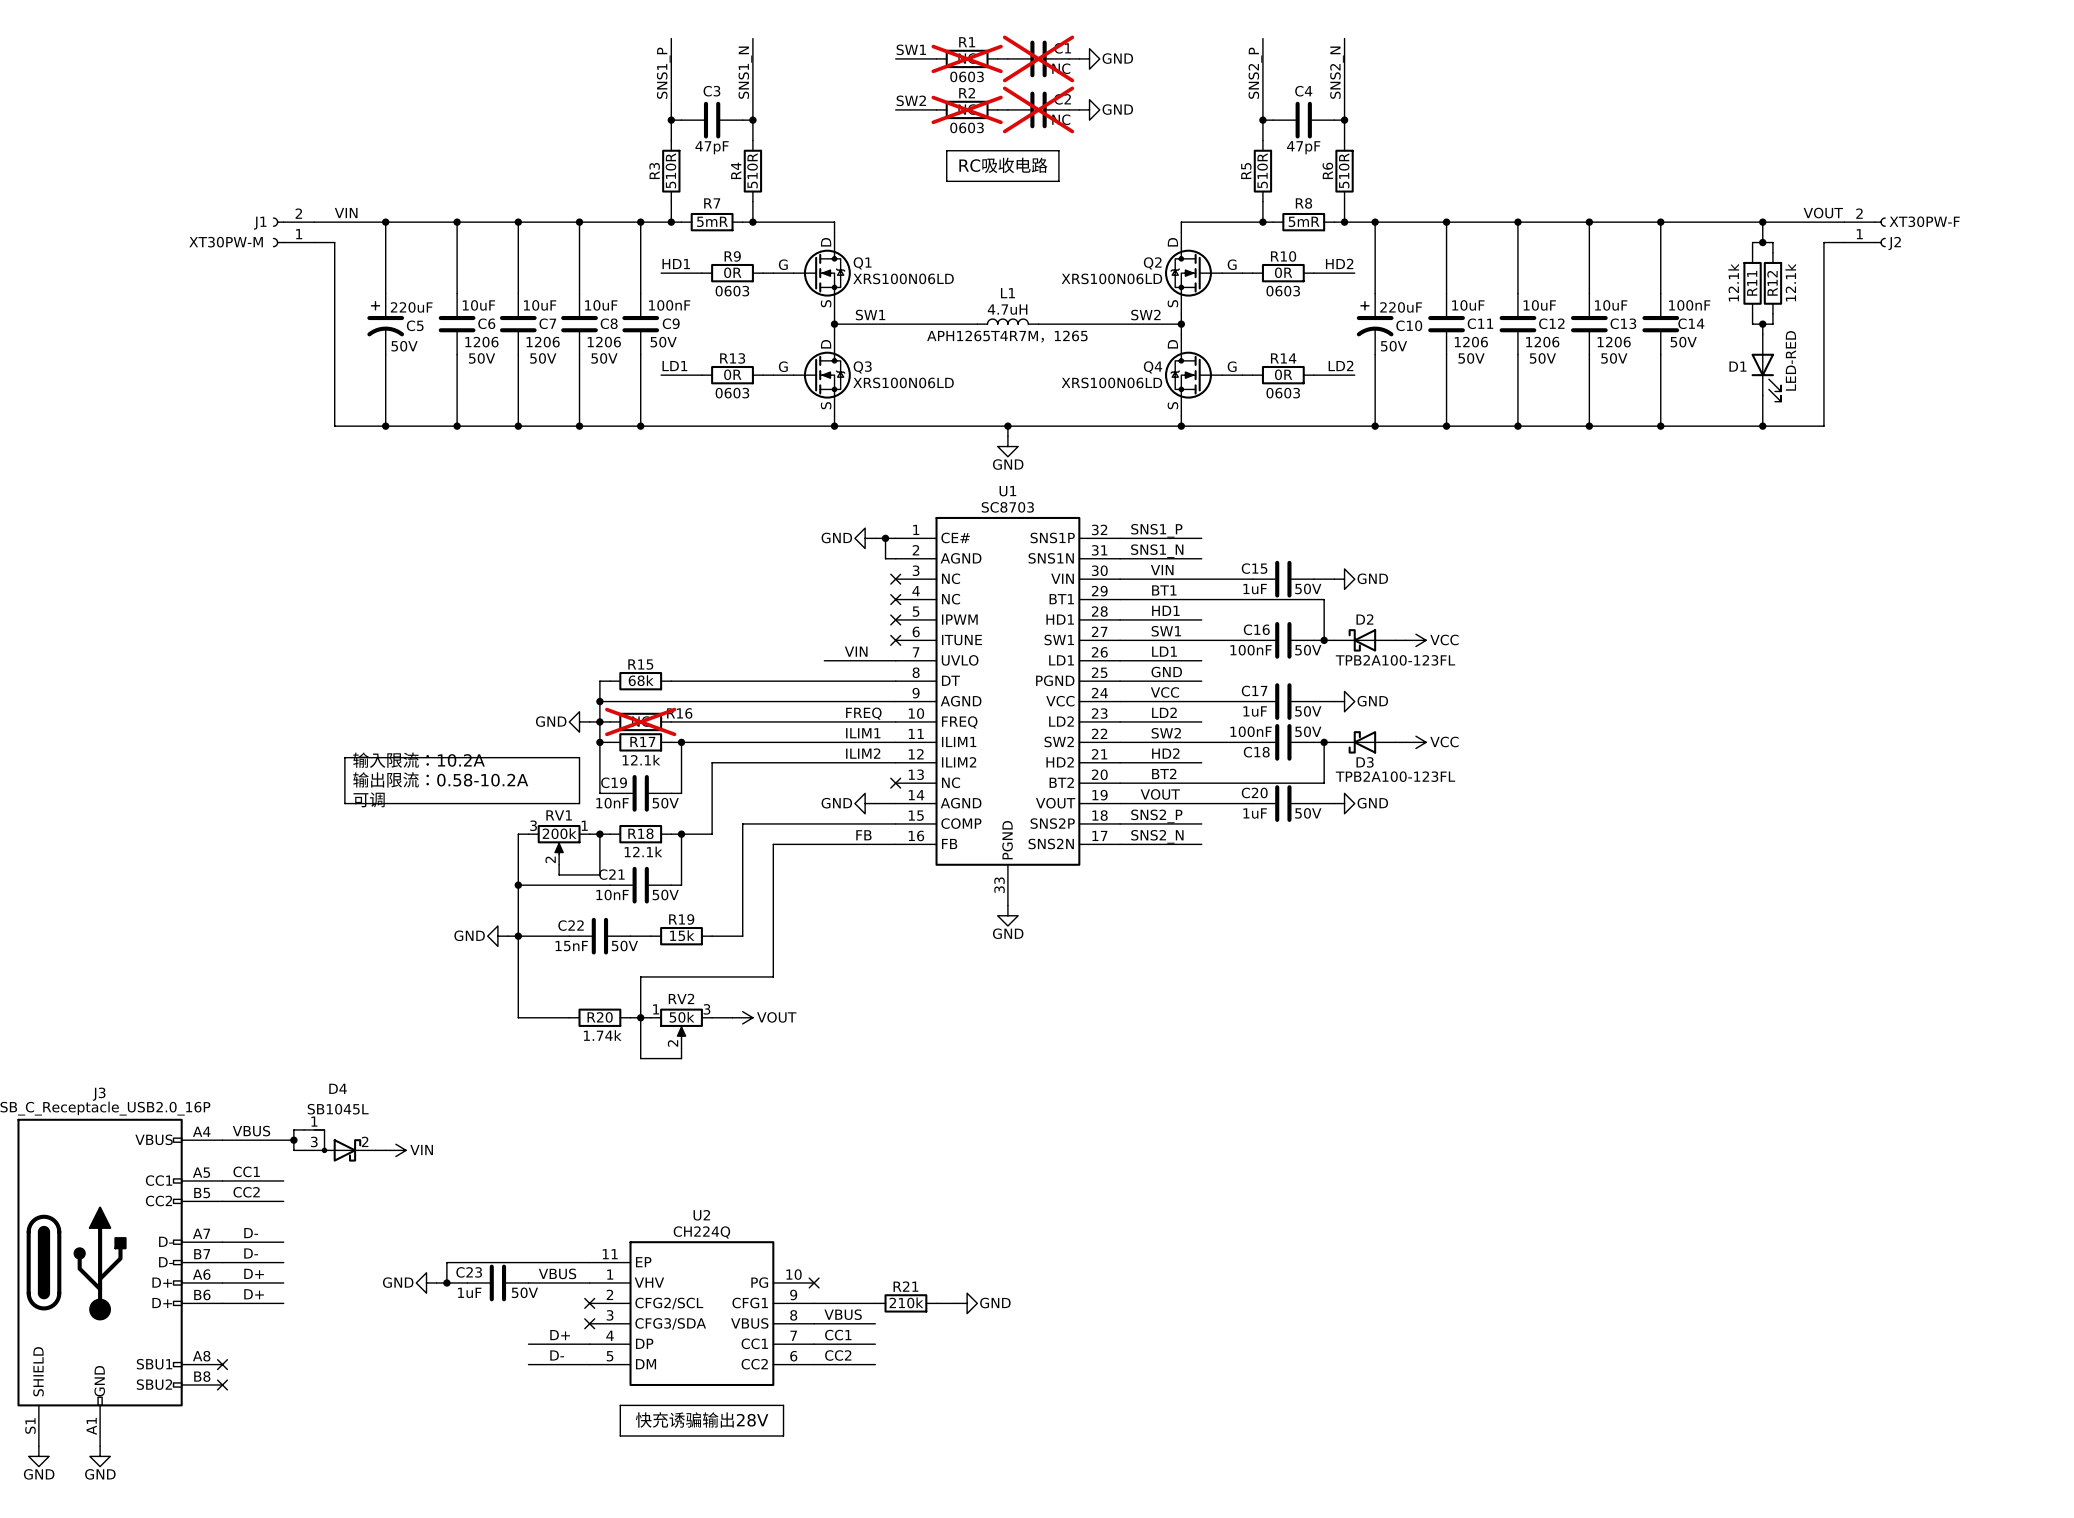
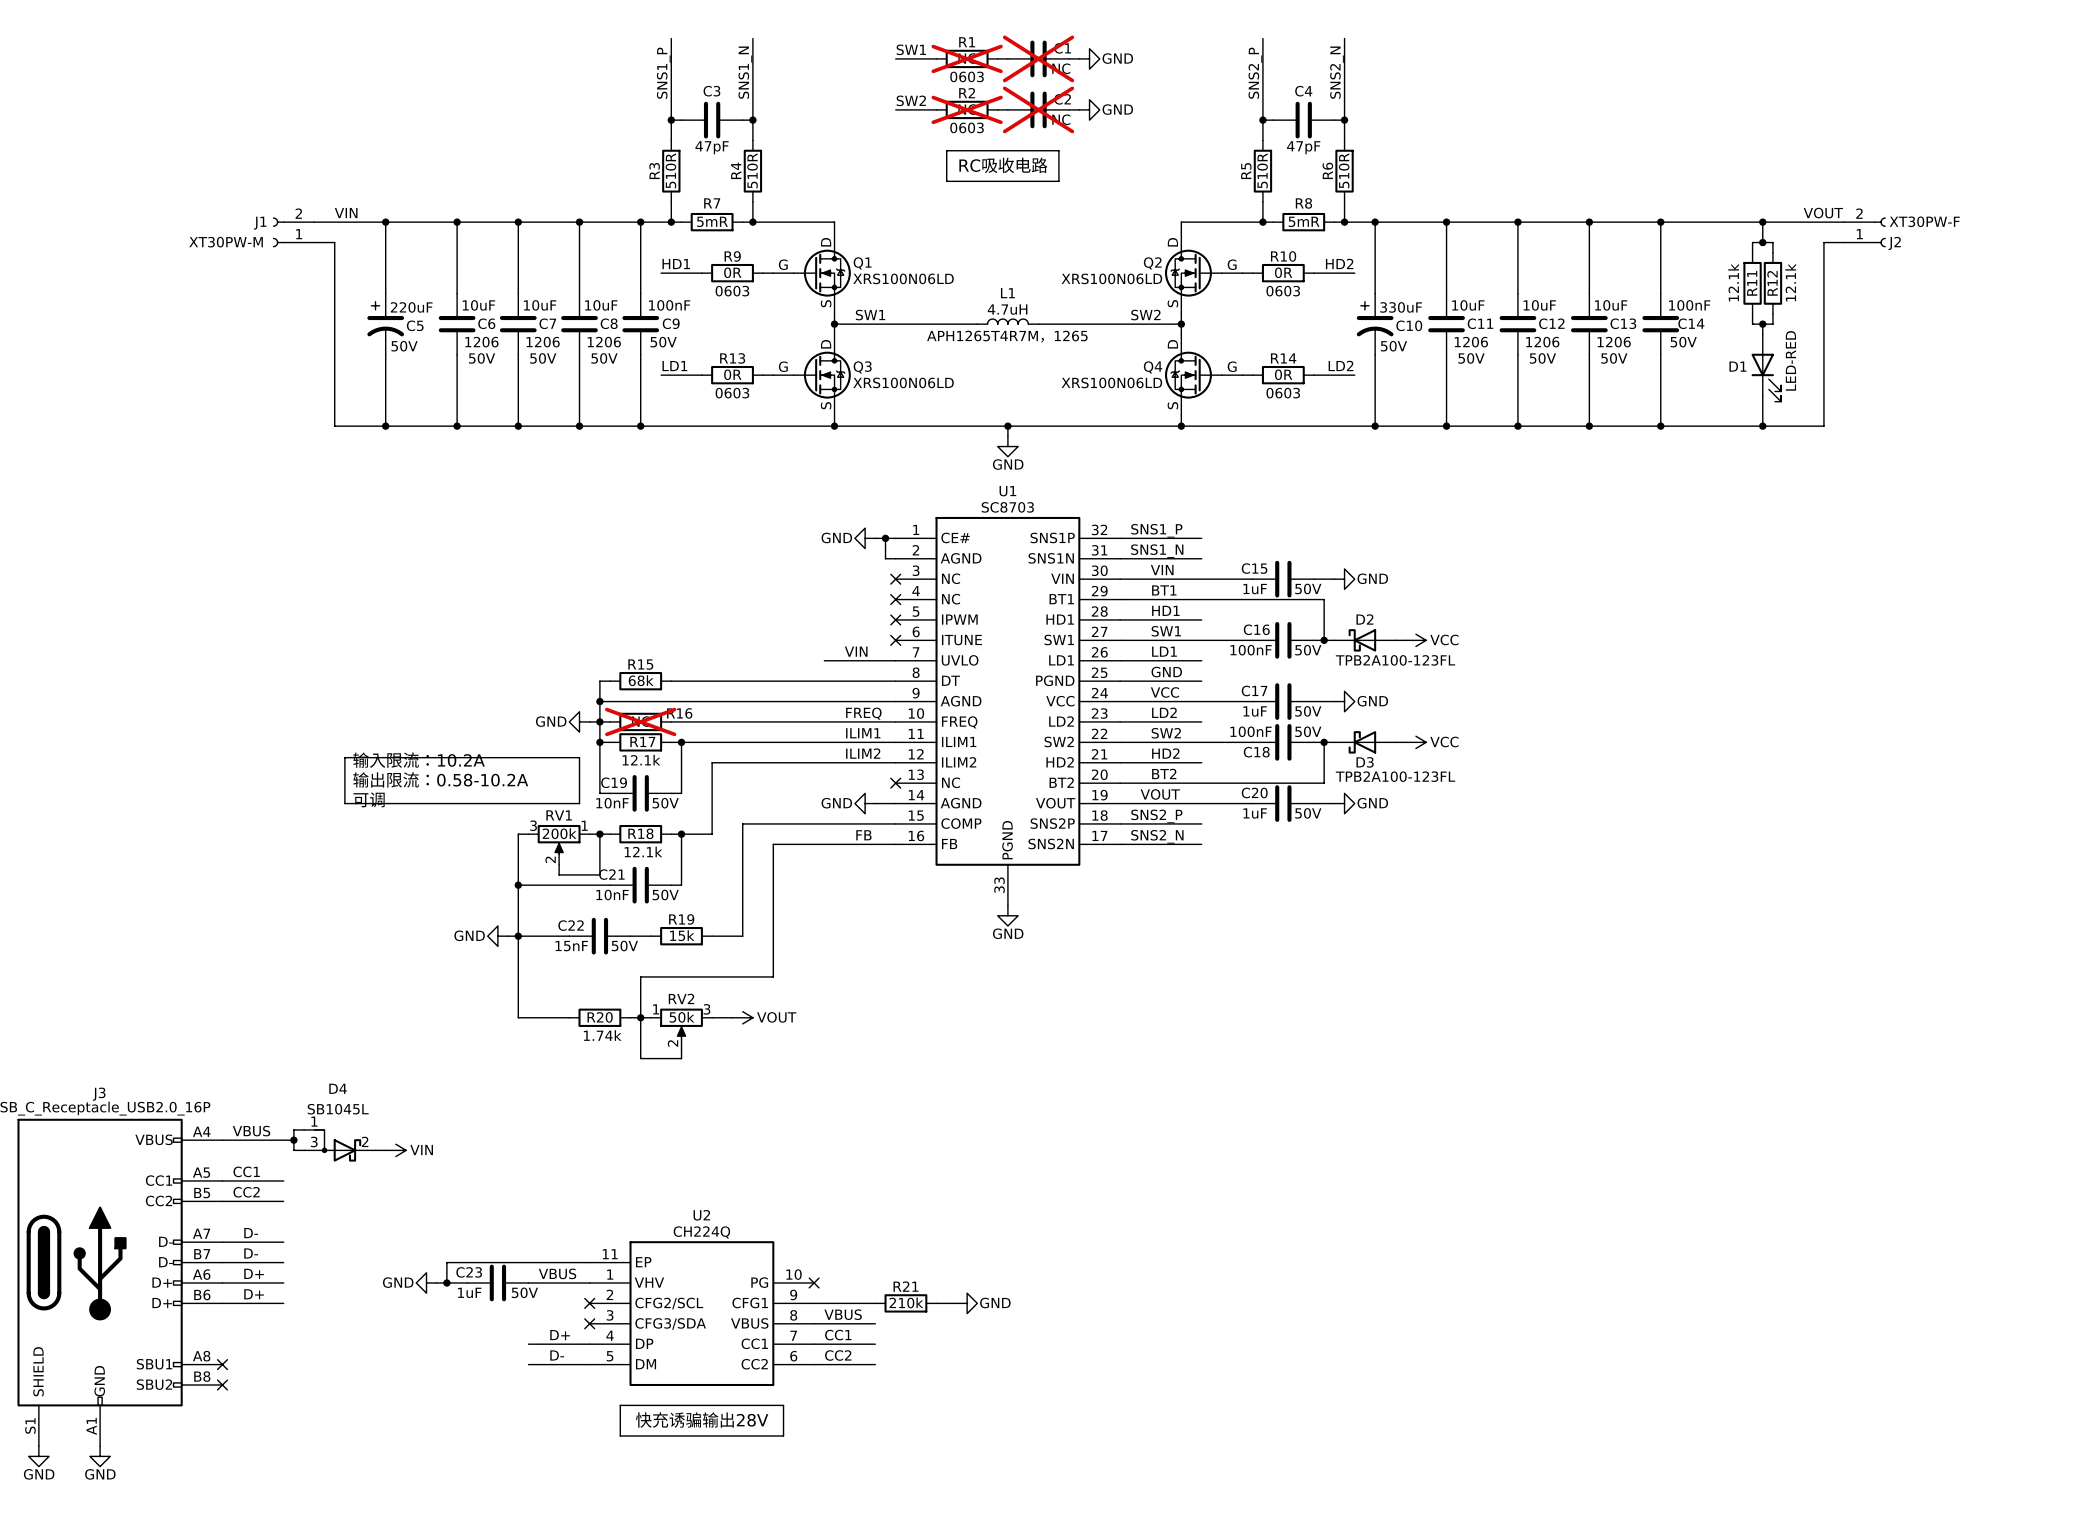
C10 value: 220uF (1401, 307) -> 330uF (1401, 307)

